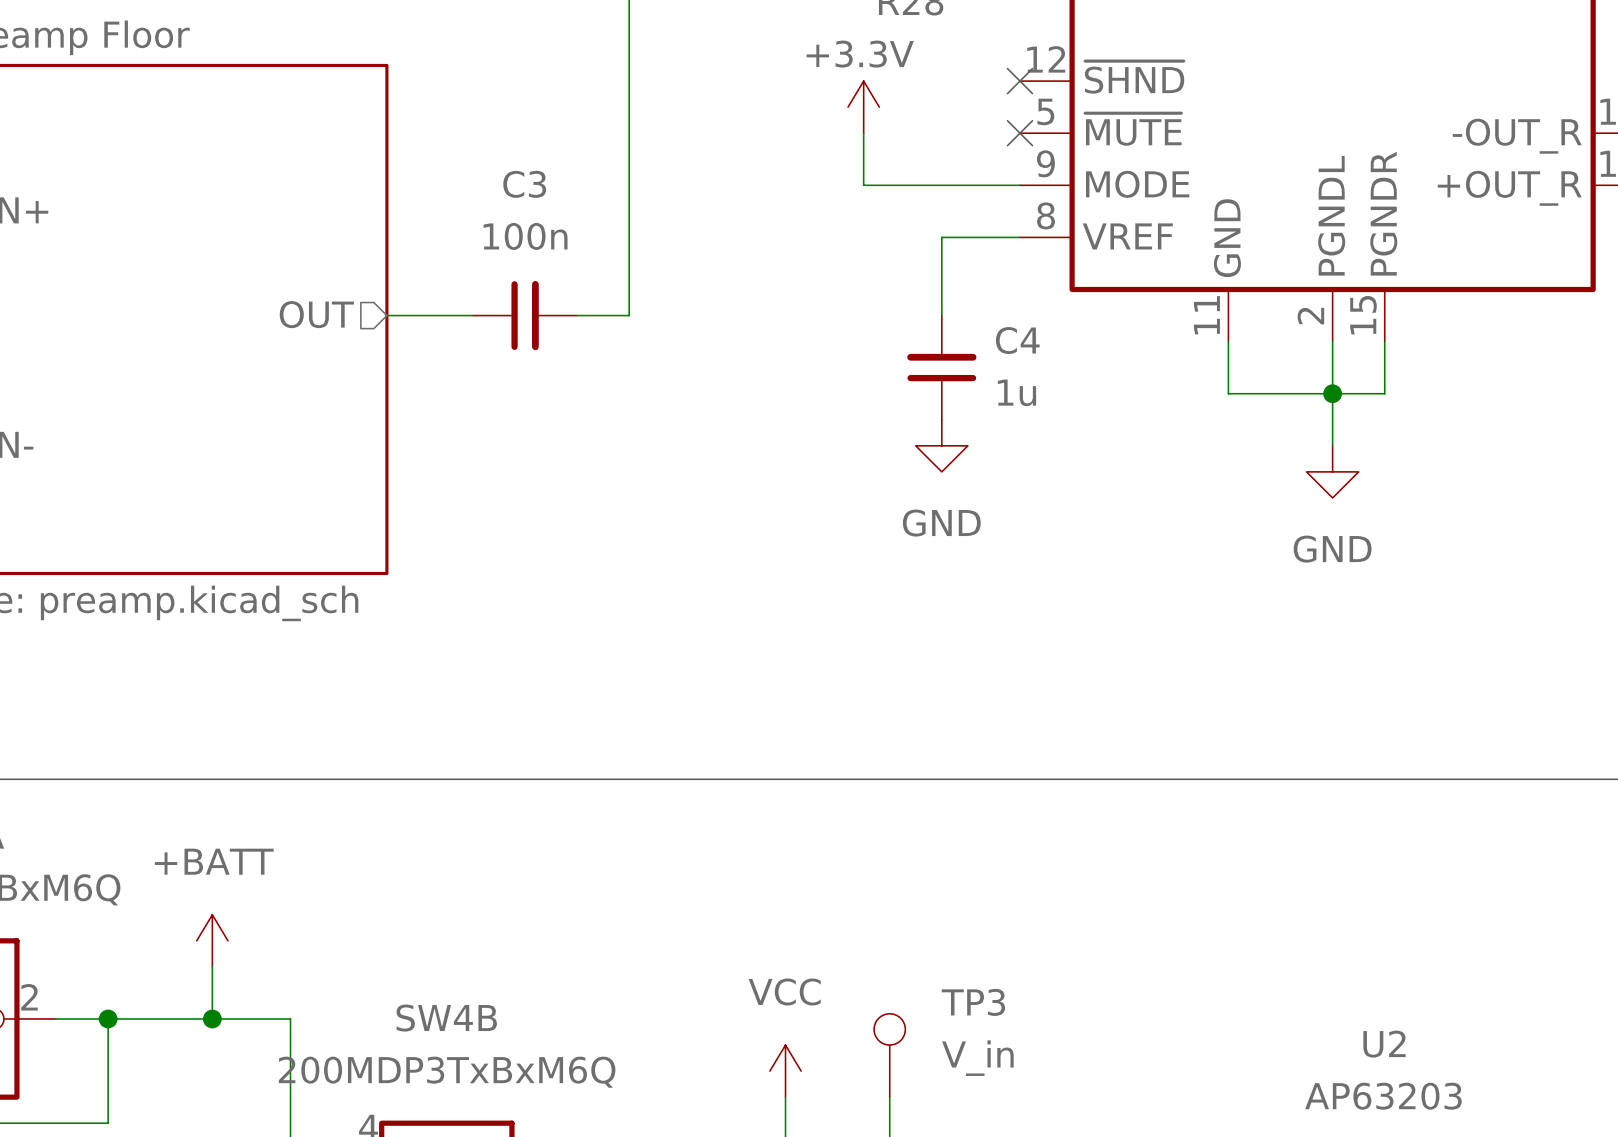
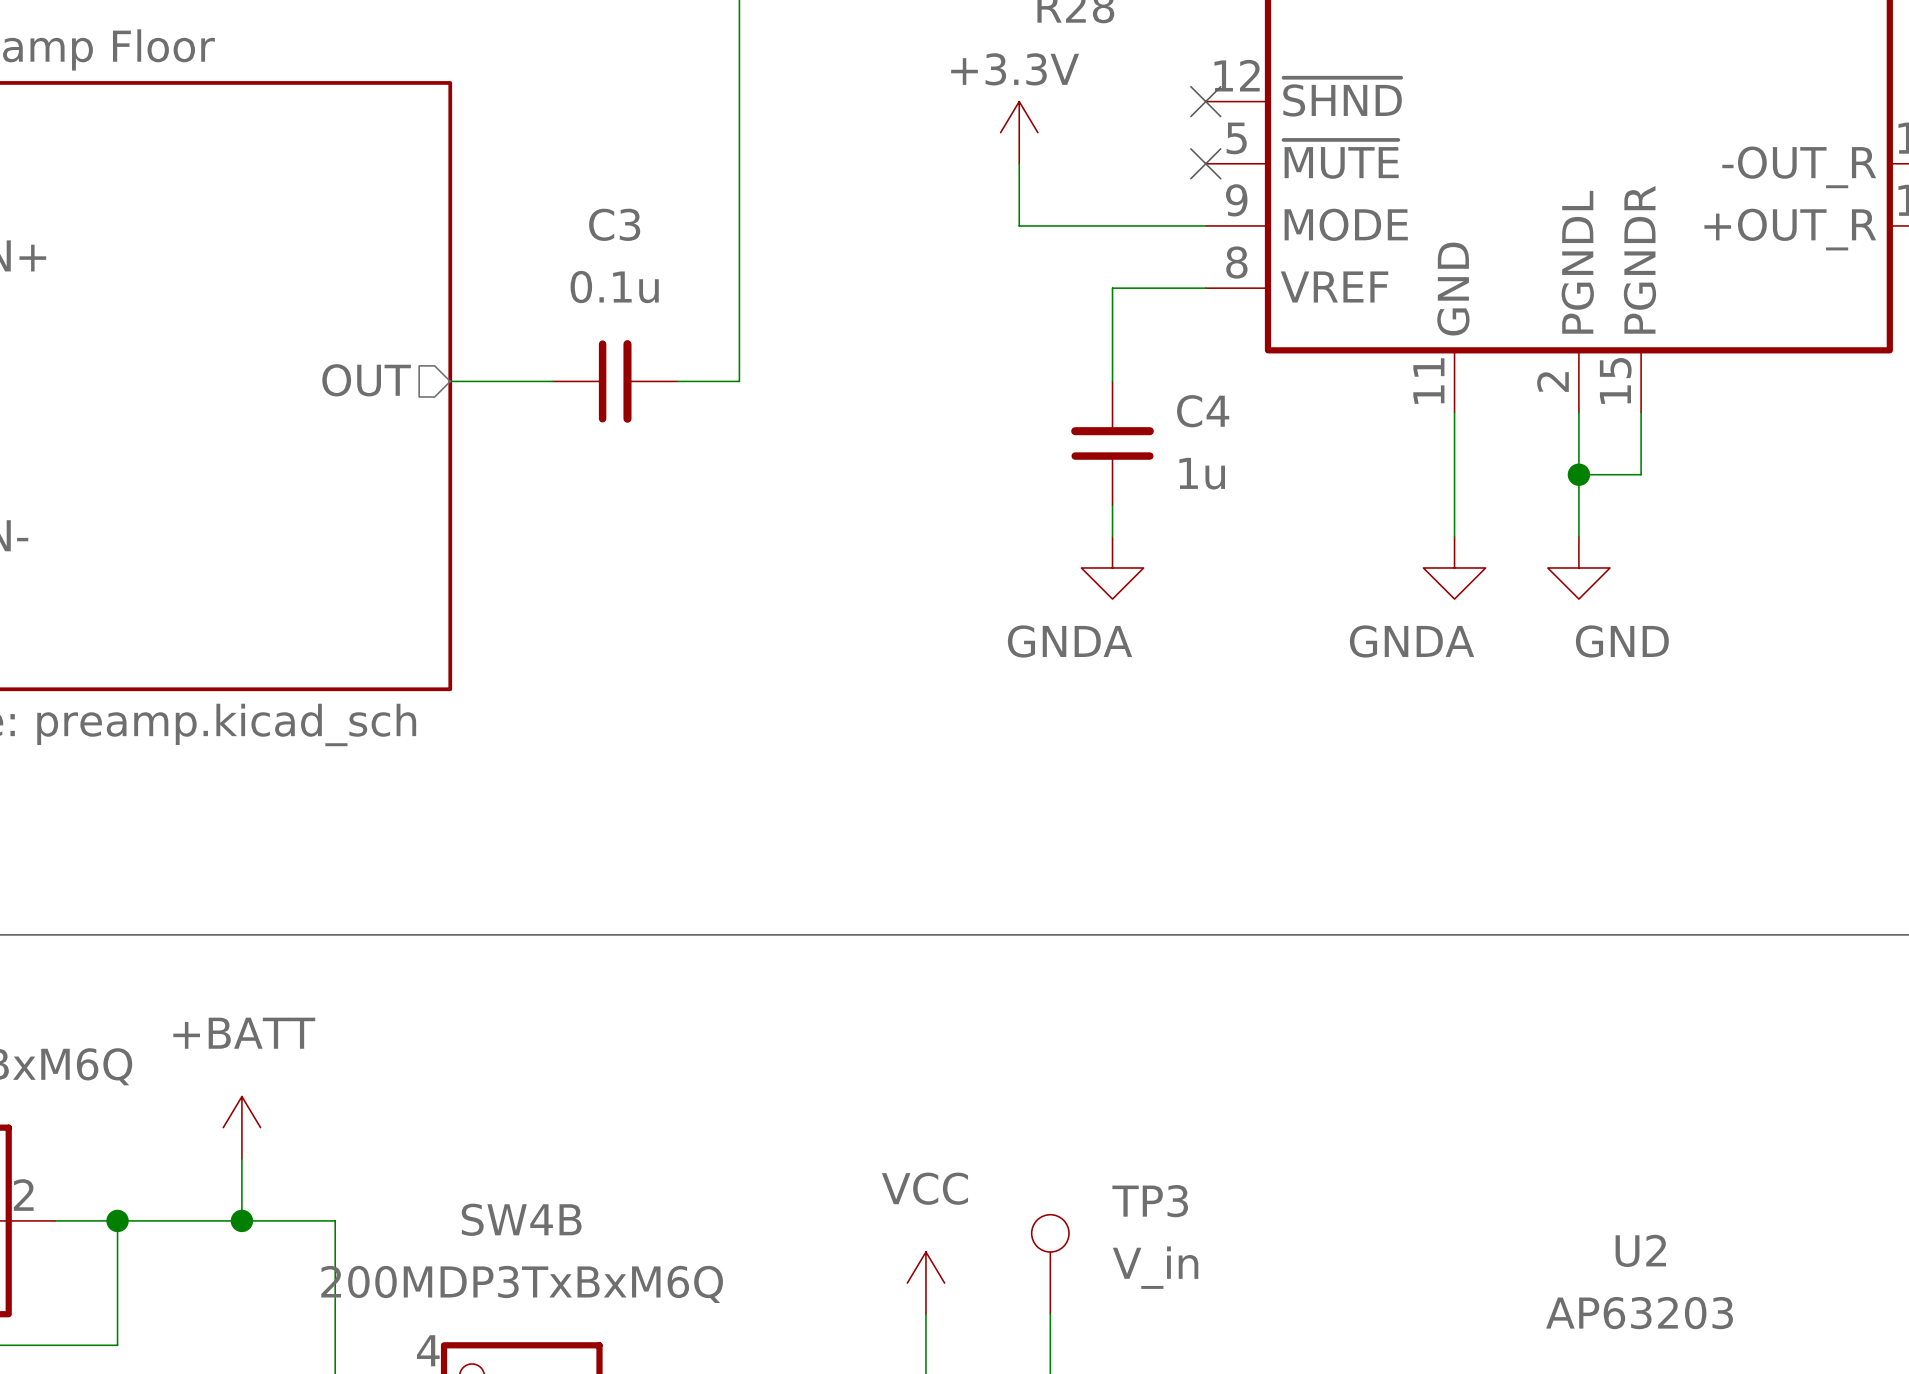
C3 value: 100n (525, 236) -> 0.1u (614, 287)
wire: (1228, 393) (1332, 393) -> (1454, 474) (1454, 536)
power symbol: GND (941, 445) -> none
power symbol: none -> GNDA (1112, 567)
power symbol: none -> GNDA (1454, 567)
power symbol text position: GND (1332, 549) -> GND (1622, 641)

